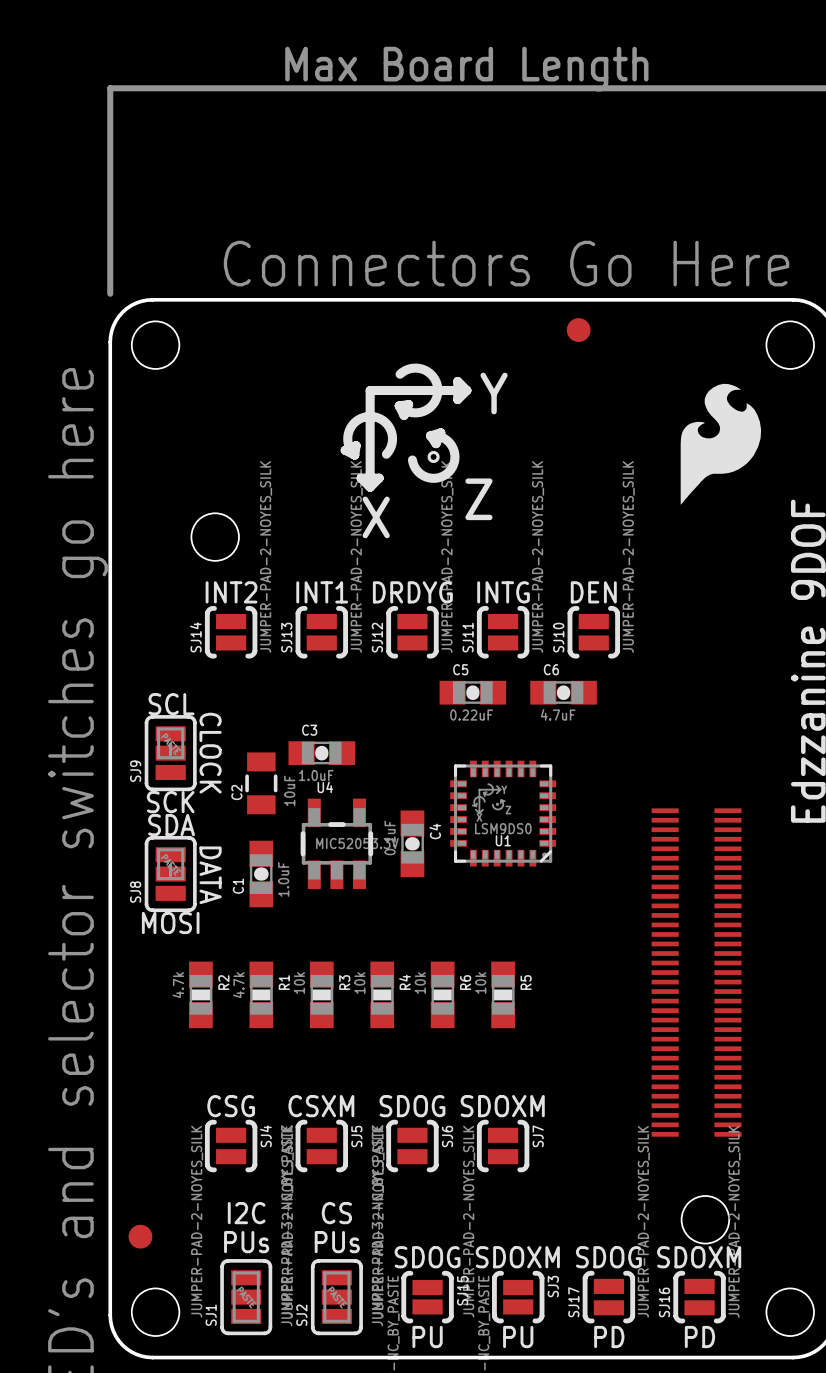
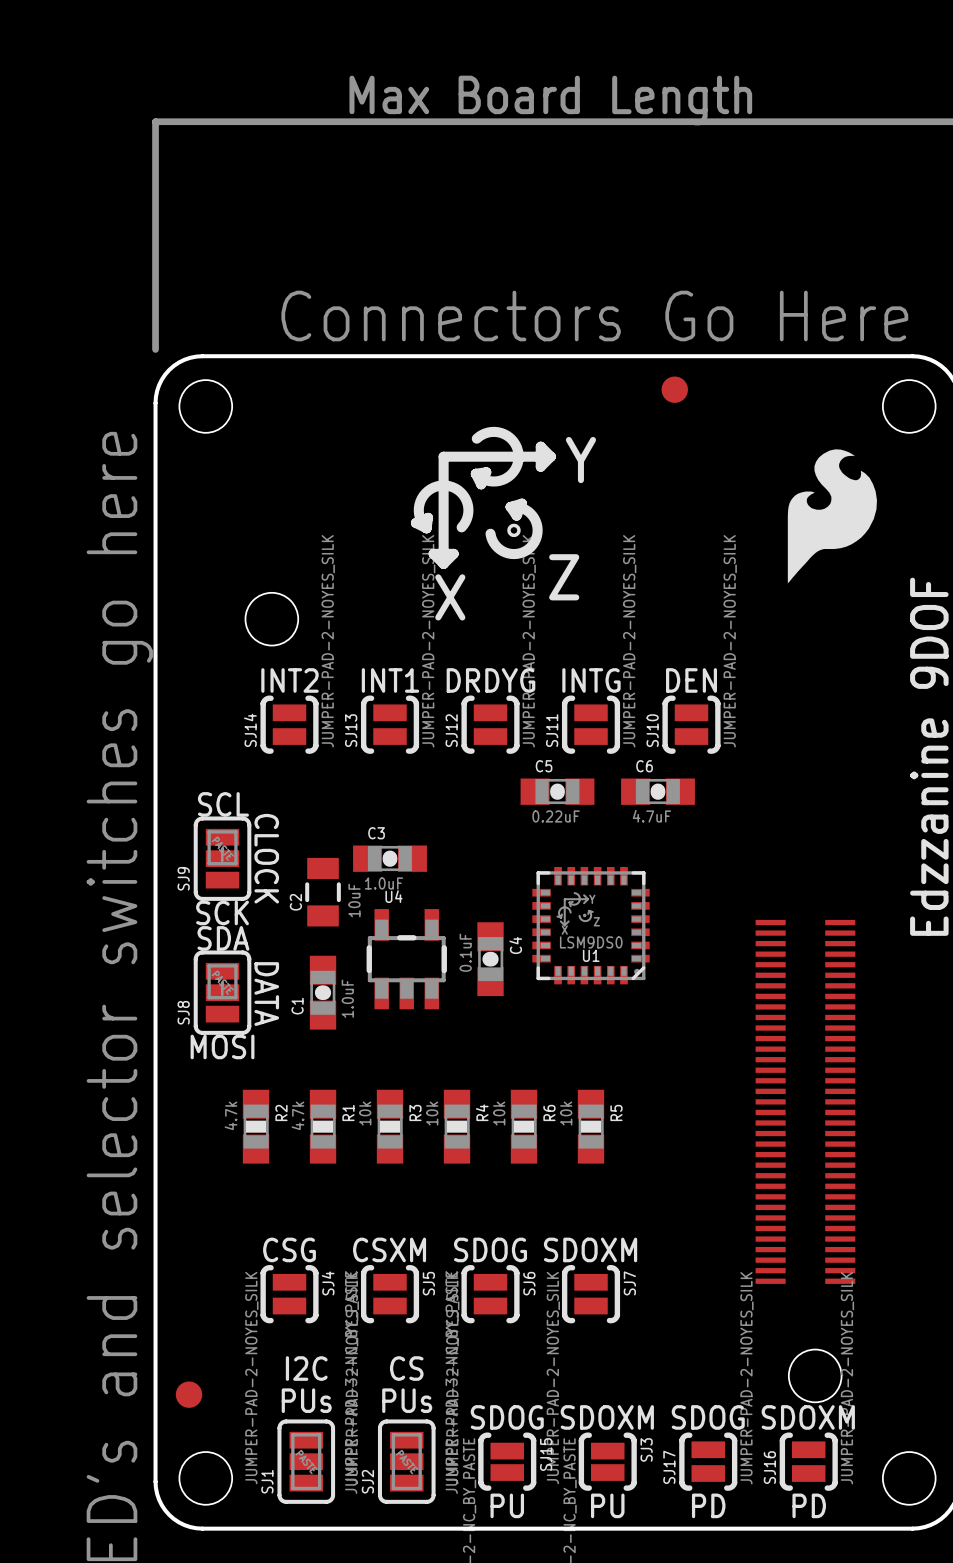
U4 value: MIC52053.3V (357, 843) -> none

